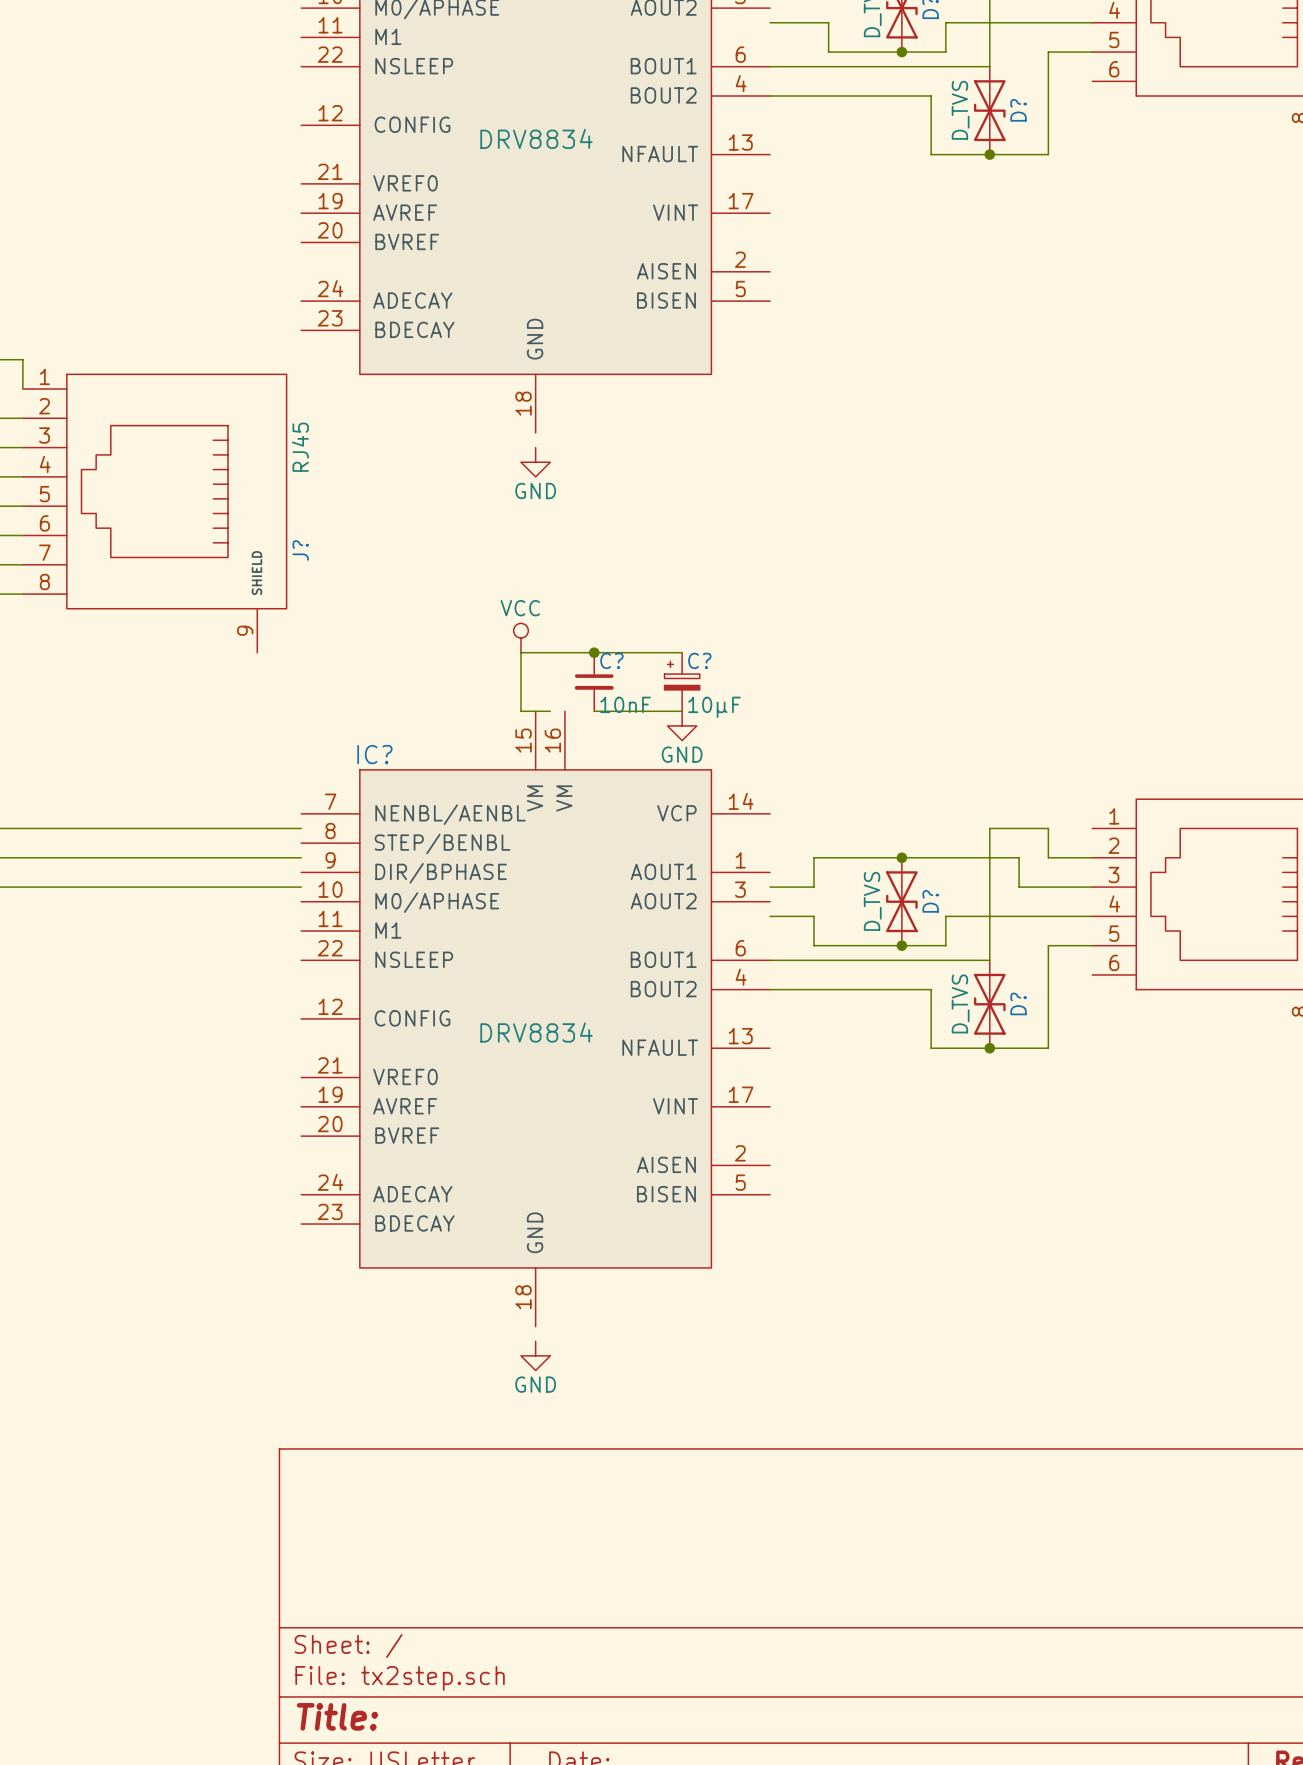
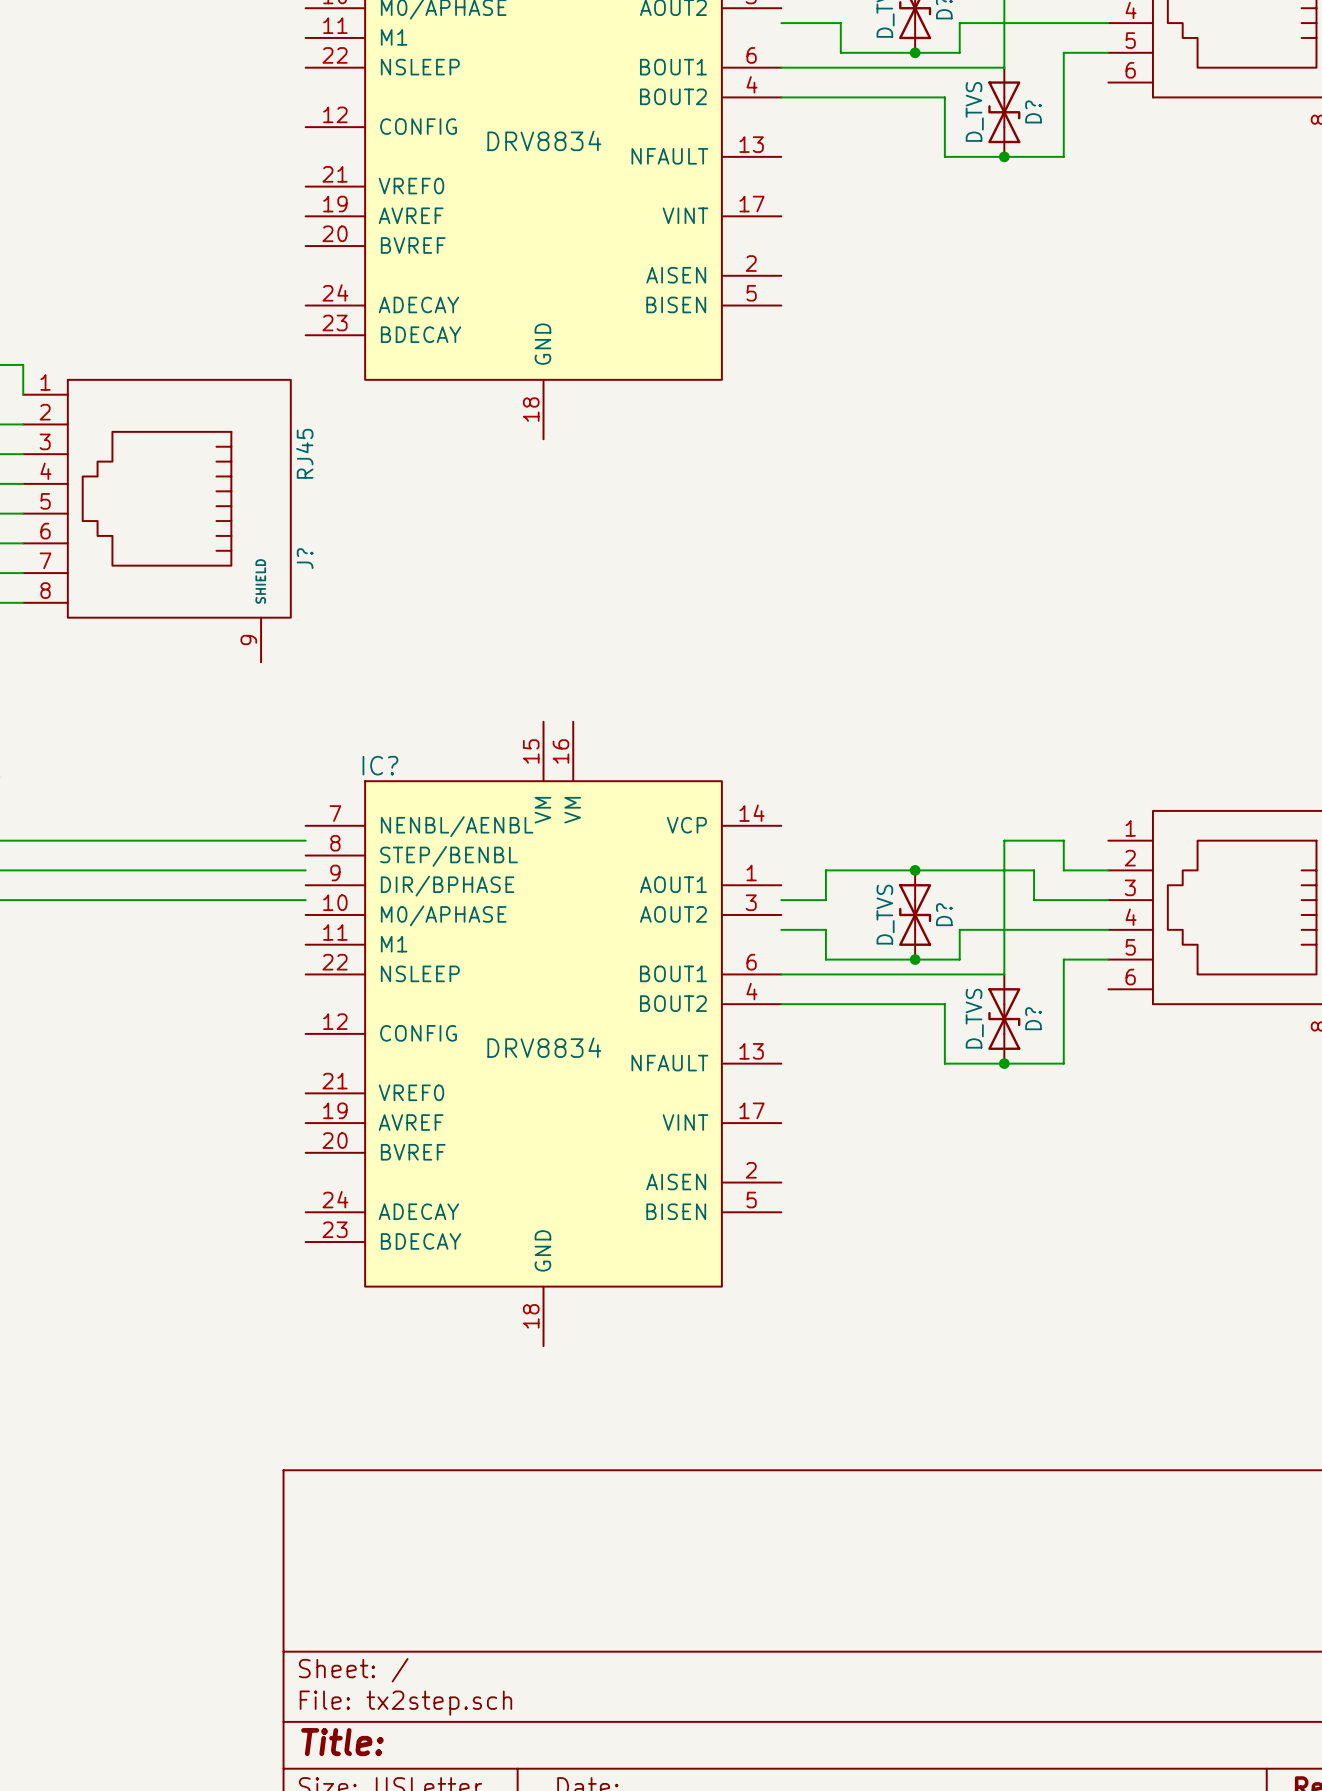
power symbol: GND (535, 462) -> none
power symbol: VCC (520, 638) -> none
junction: (594, 652) -> none
wire: (682, 652) (520, 652) (520, 711) (550, 711) -> none
C?: 10nF (594, 681) -> none
C?: 10µF (682, 681) -> none
wire: (594, 711) (682, 711) -> none
power symbol: GND (682, 725) -> none
power symbol: GND (535, 1355) -> none

